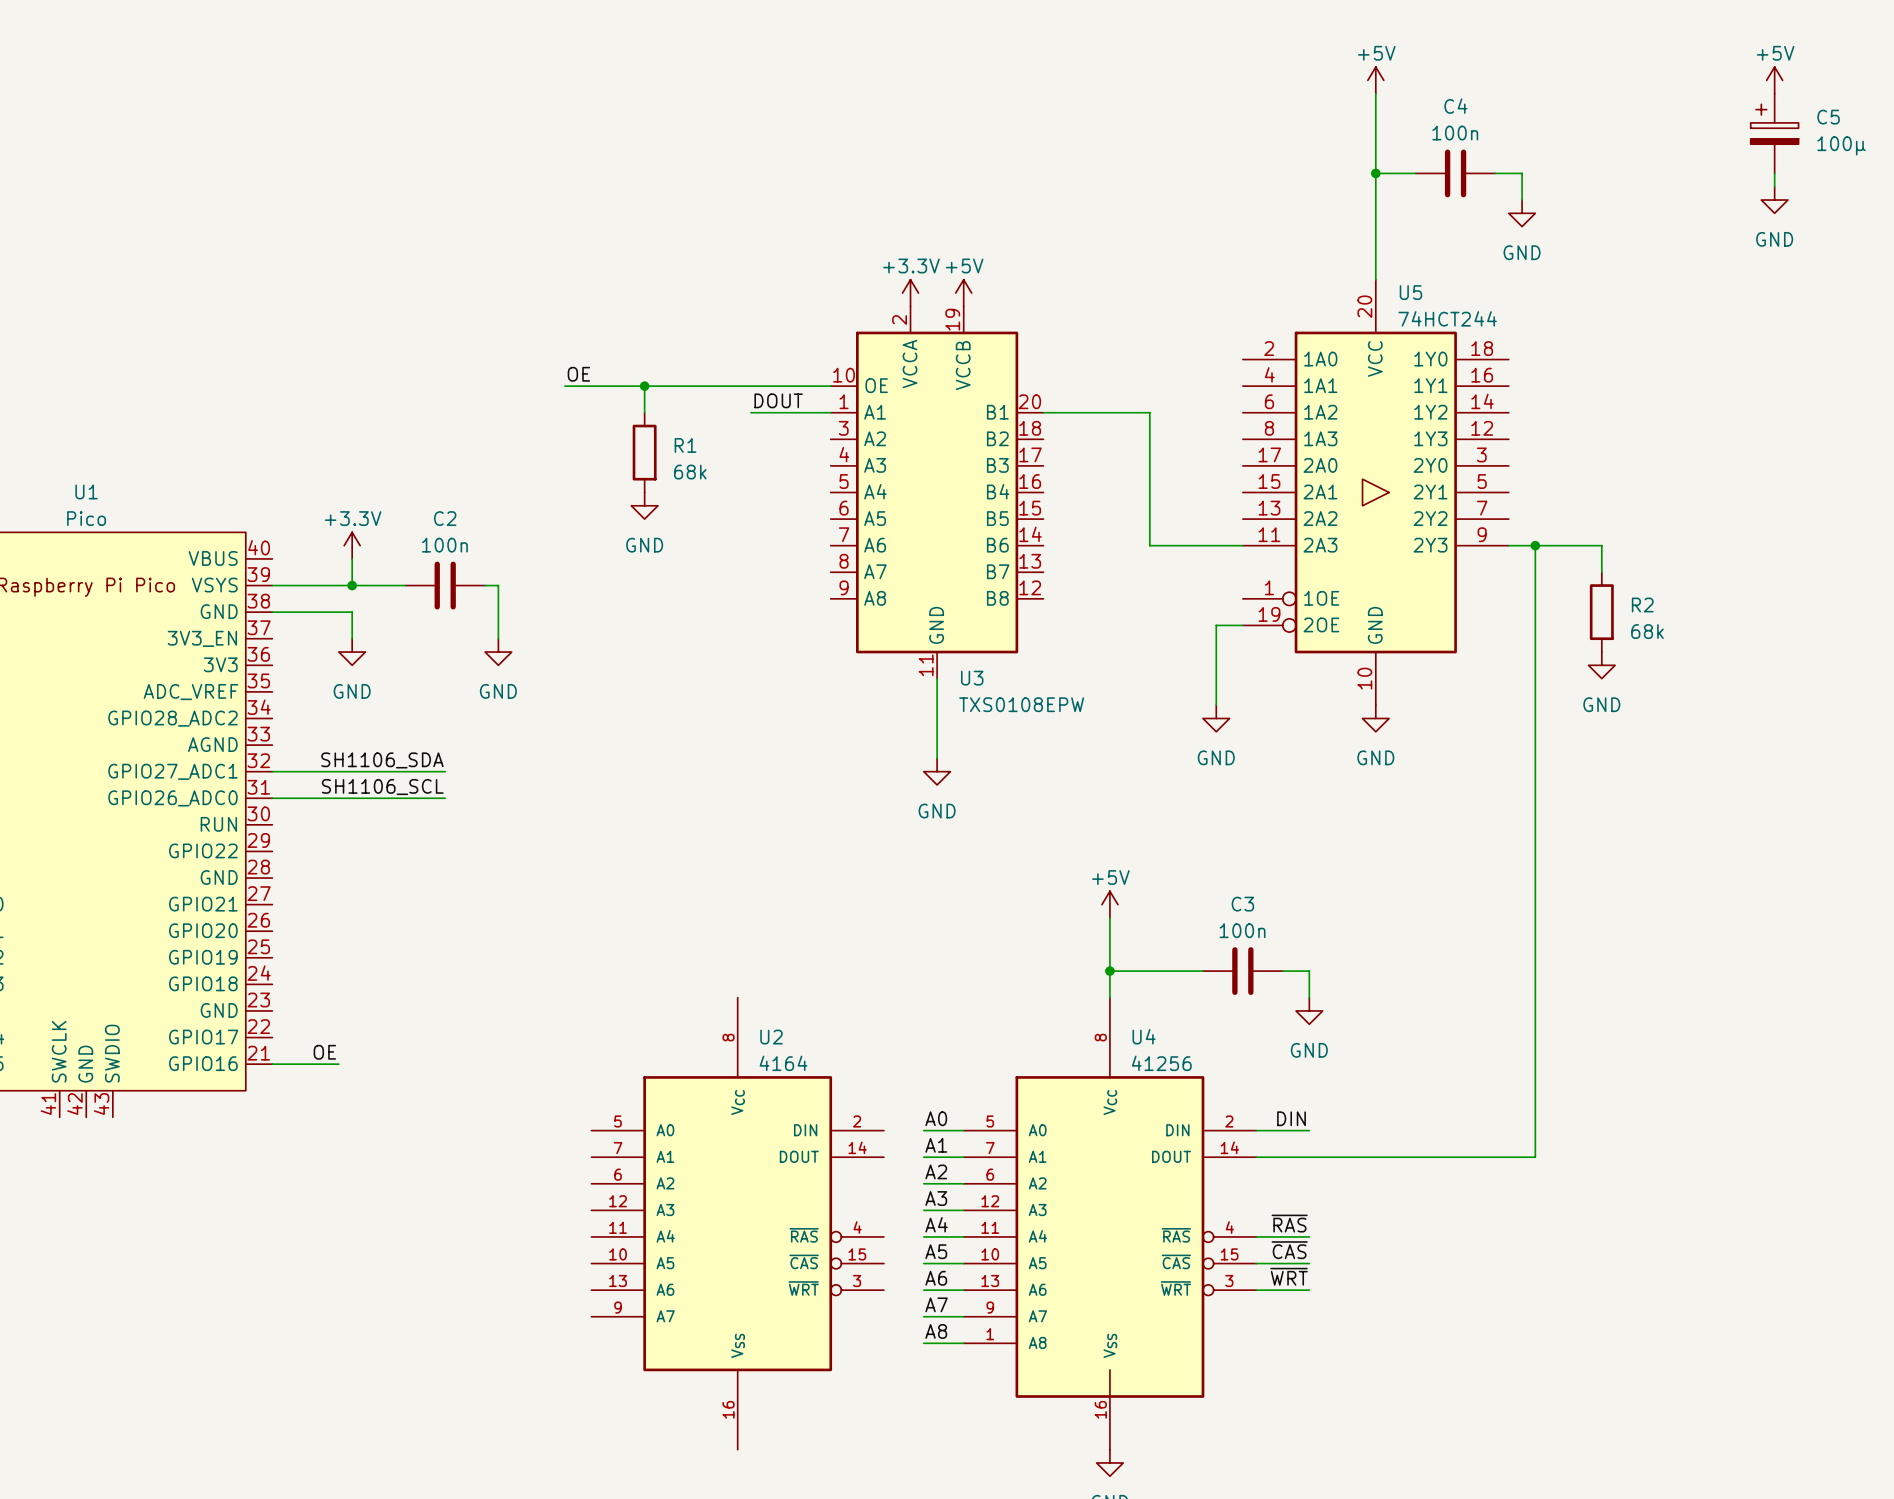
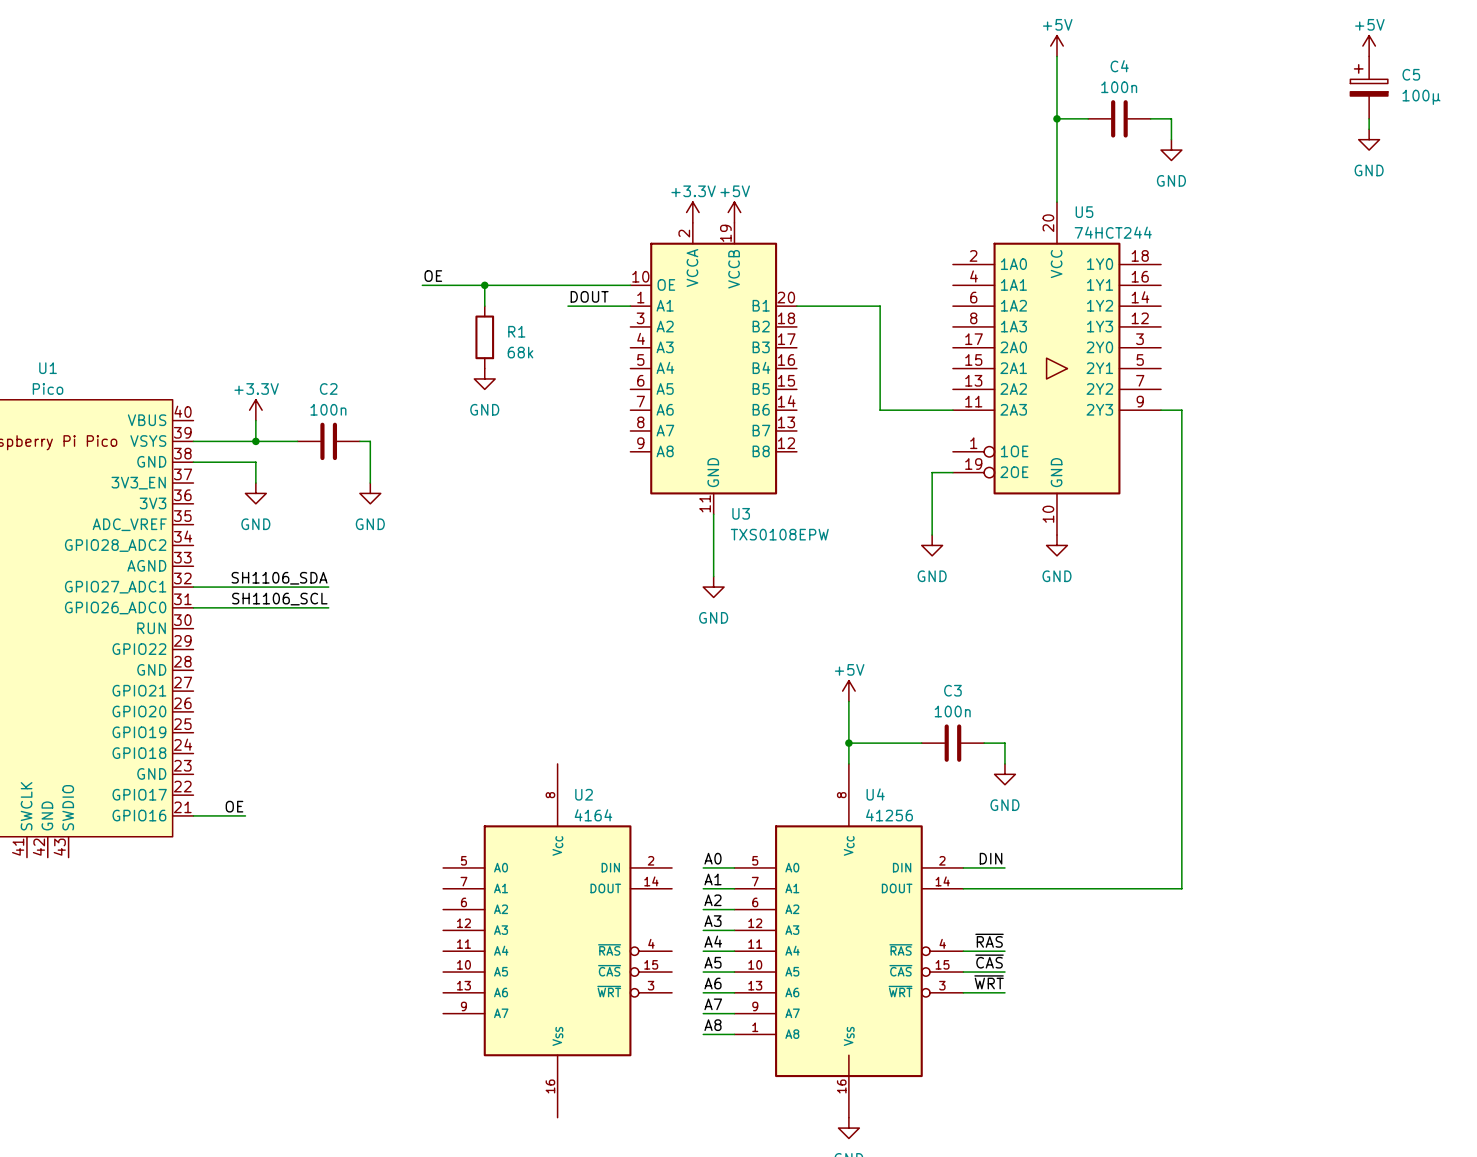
wire: (1535, 545) (1601, 545) (1601, 572) -> none
junction: (1535, 545) -> none
R2: 68k (1601, 612) -> none
power symbol: GND (1601, 665) -> none

